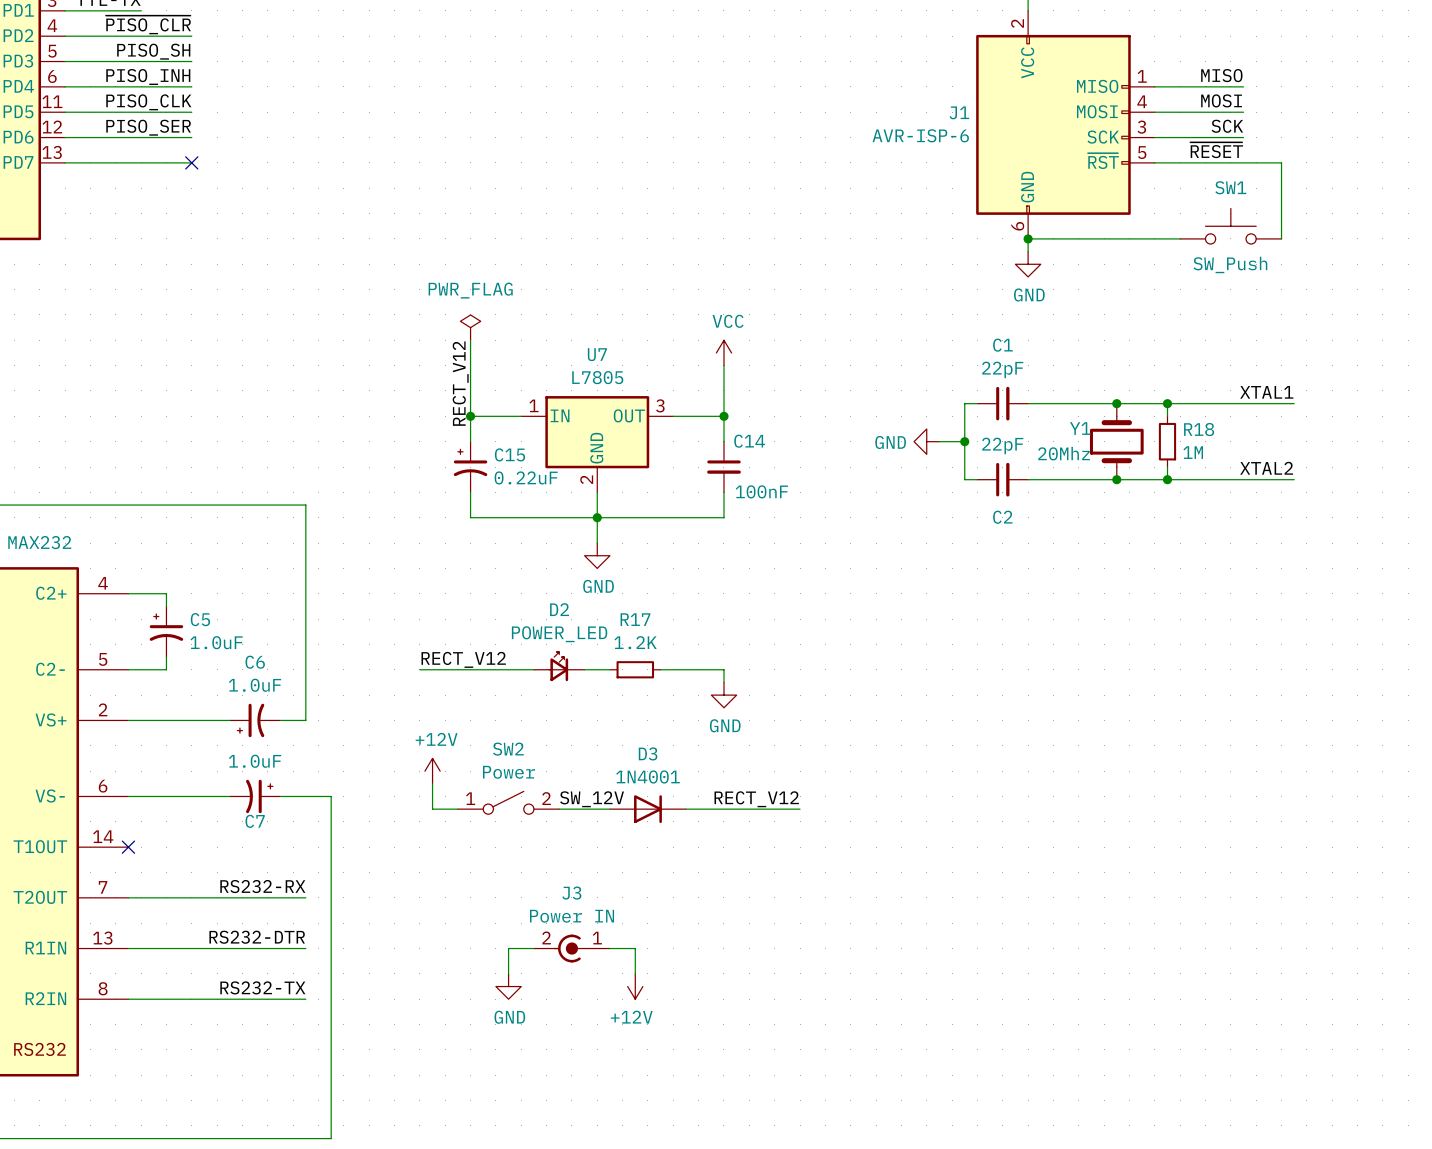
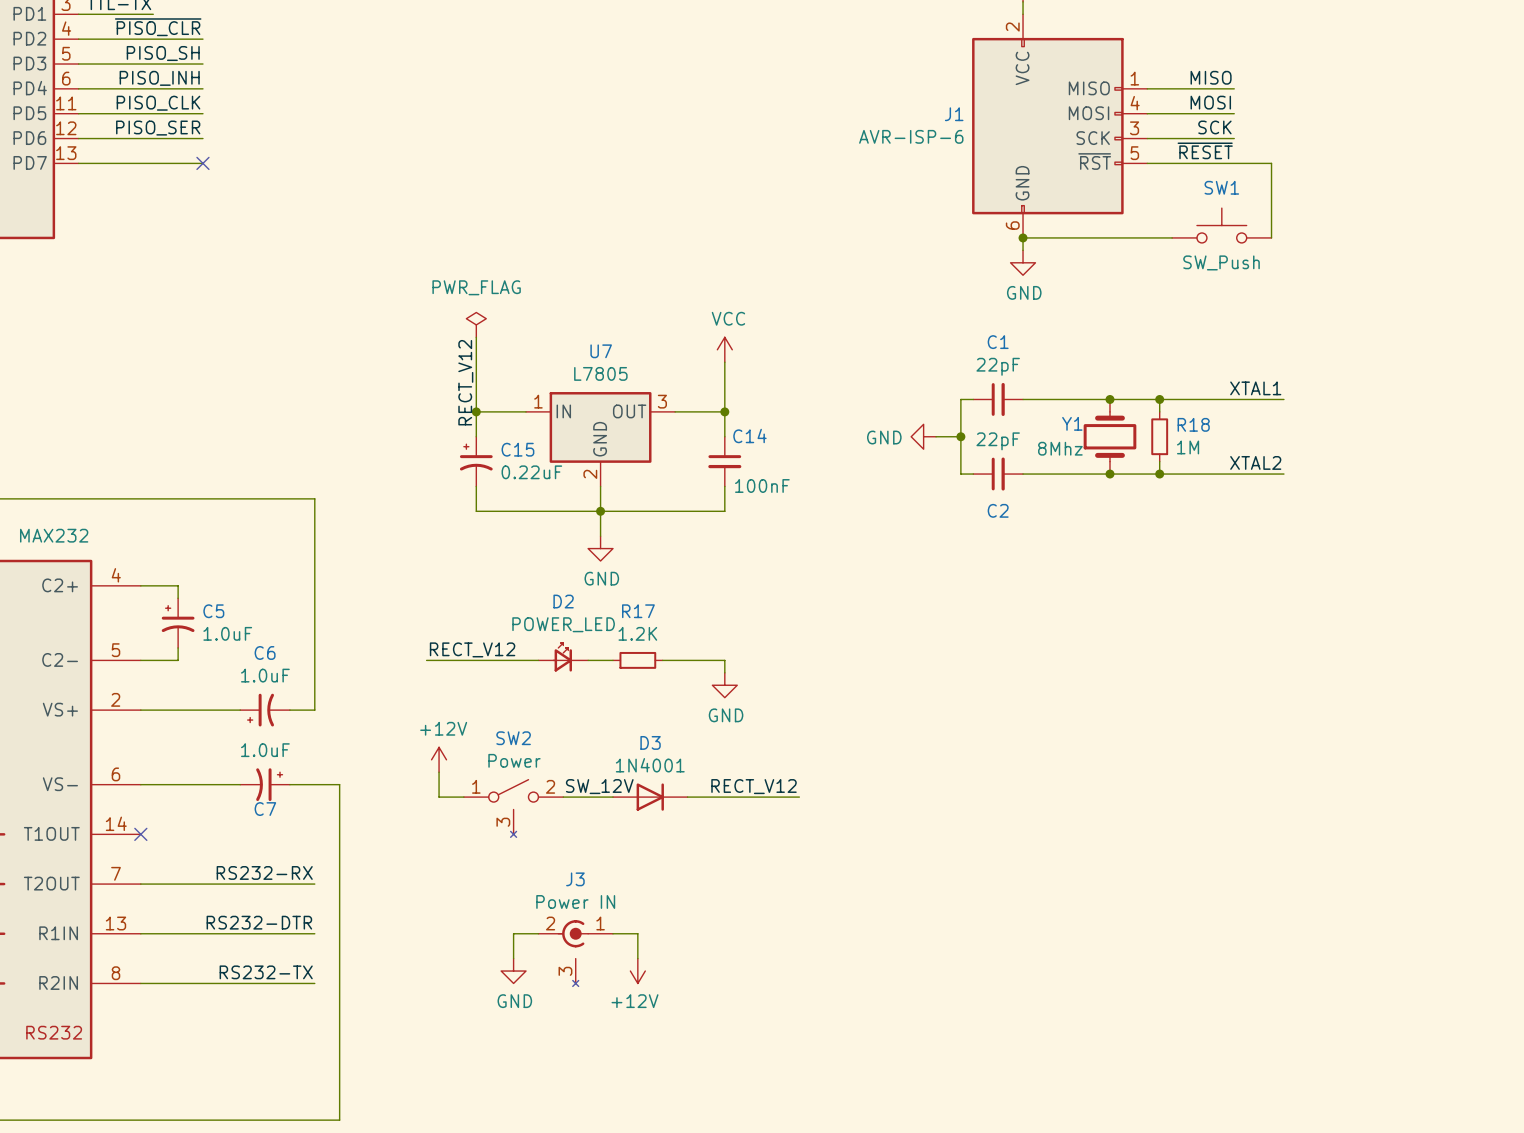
Y1 value: 20Mhz (1064, 453) -> 8Mhz (1060, 448)
SW2 symbol: [457, 791, 560, 815] -> [463, 779, 564, 838]
J3 symbol: [533, 934, 610, 963] -> [538, 920, 613, 987]

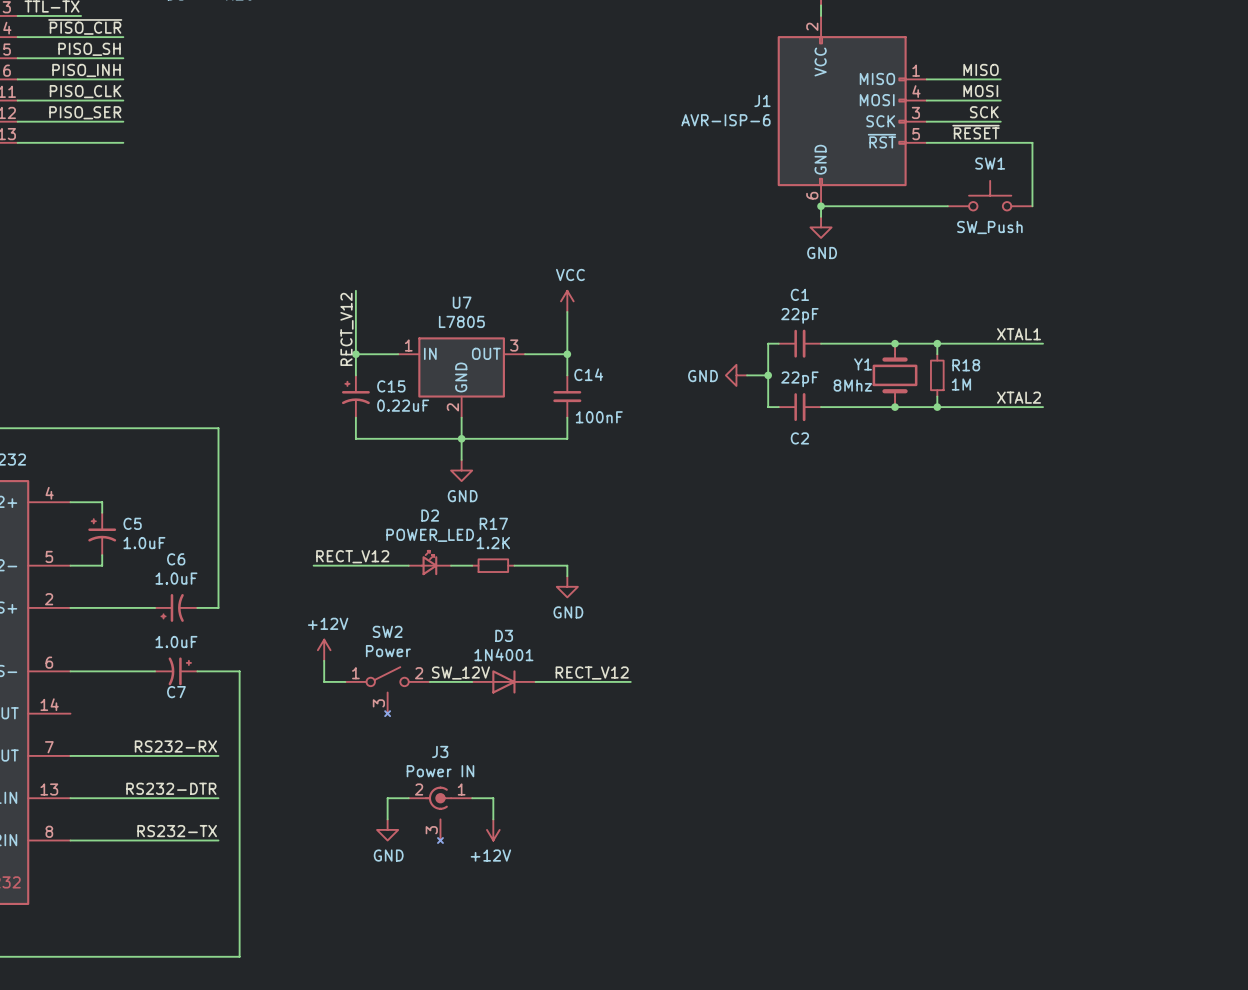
no-connect mark: (202, 163) -> none
power symbol: PWR_FLAG (476, 324) -> none
no-connect mark: (140, 834) -> none

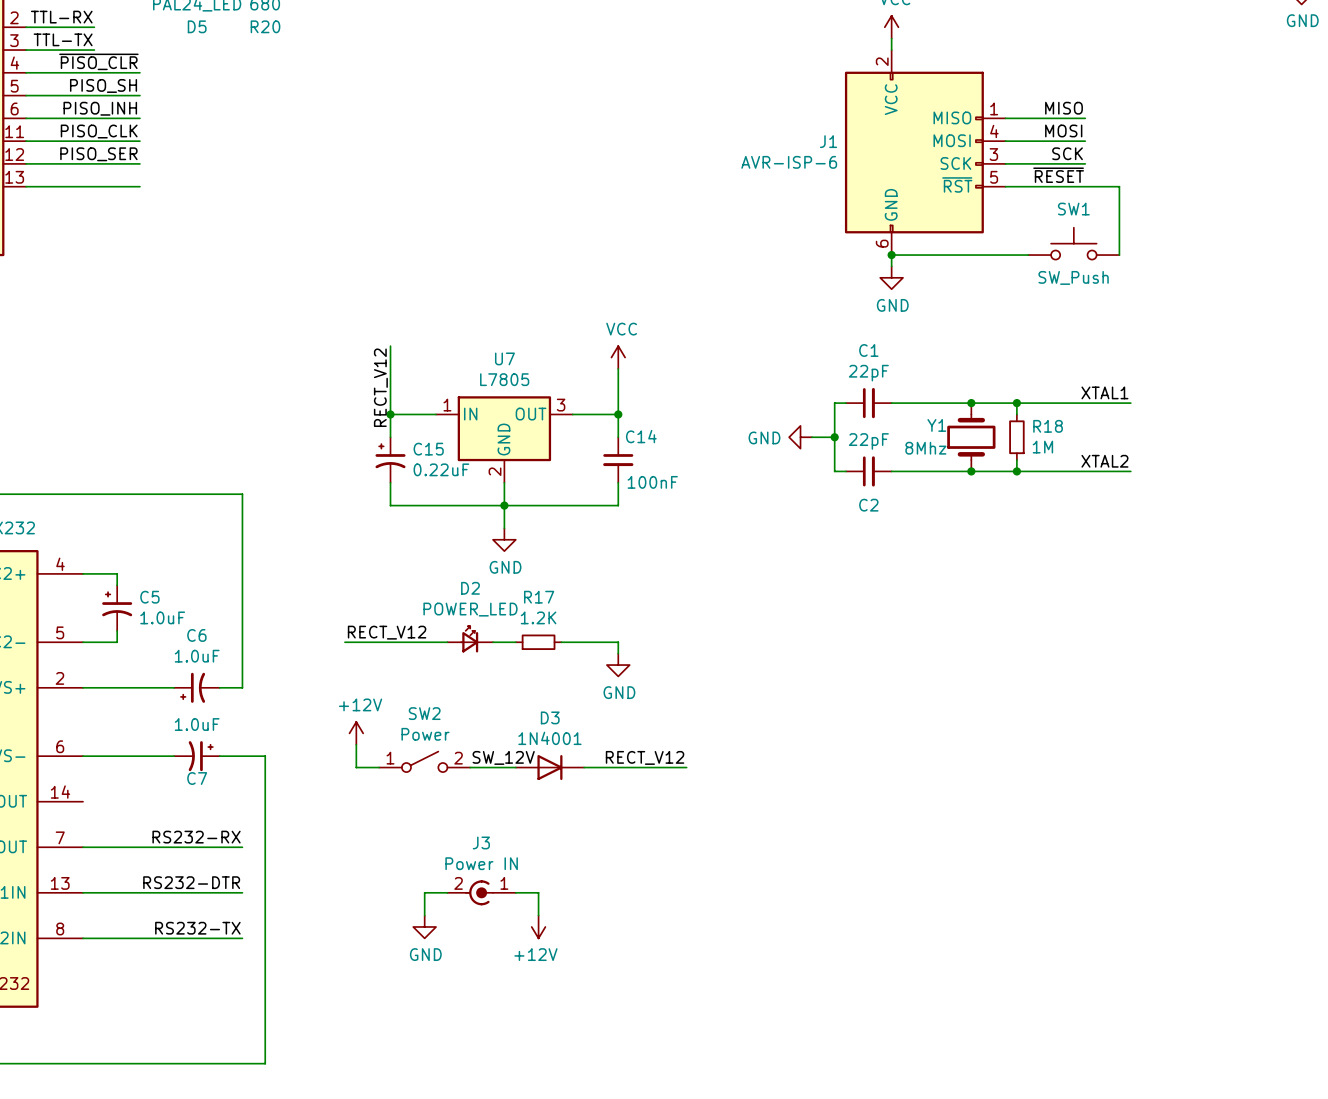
SW2 symbol: [345, 667, 430, 717] -> [379, 751, 471, 773]
J3 symbol: [408, 786, 473, 844] -> [447, 880, 516, 906]

